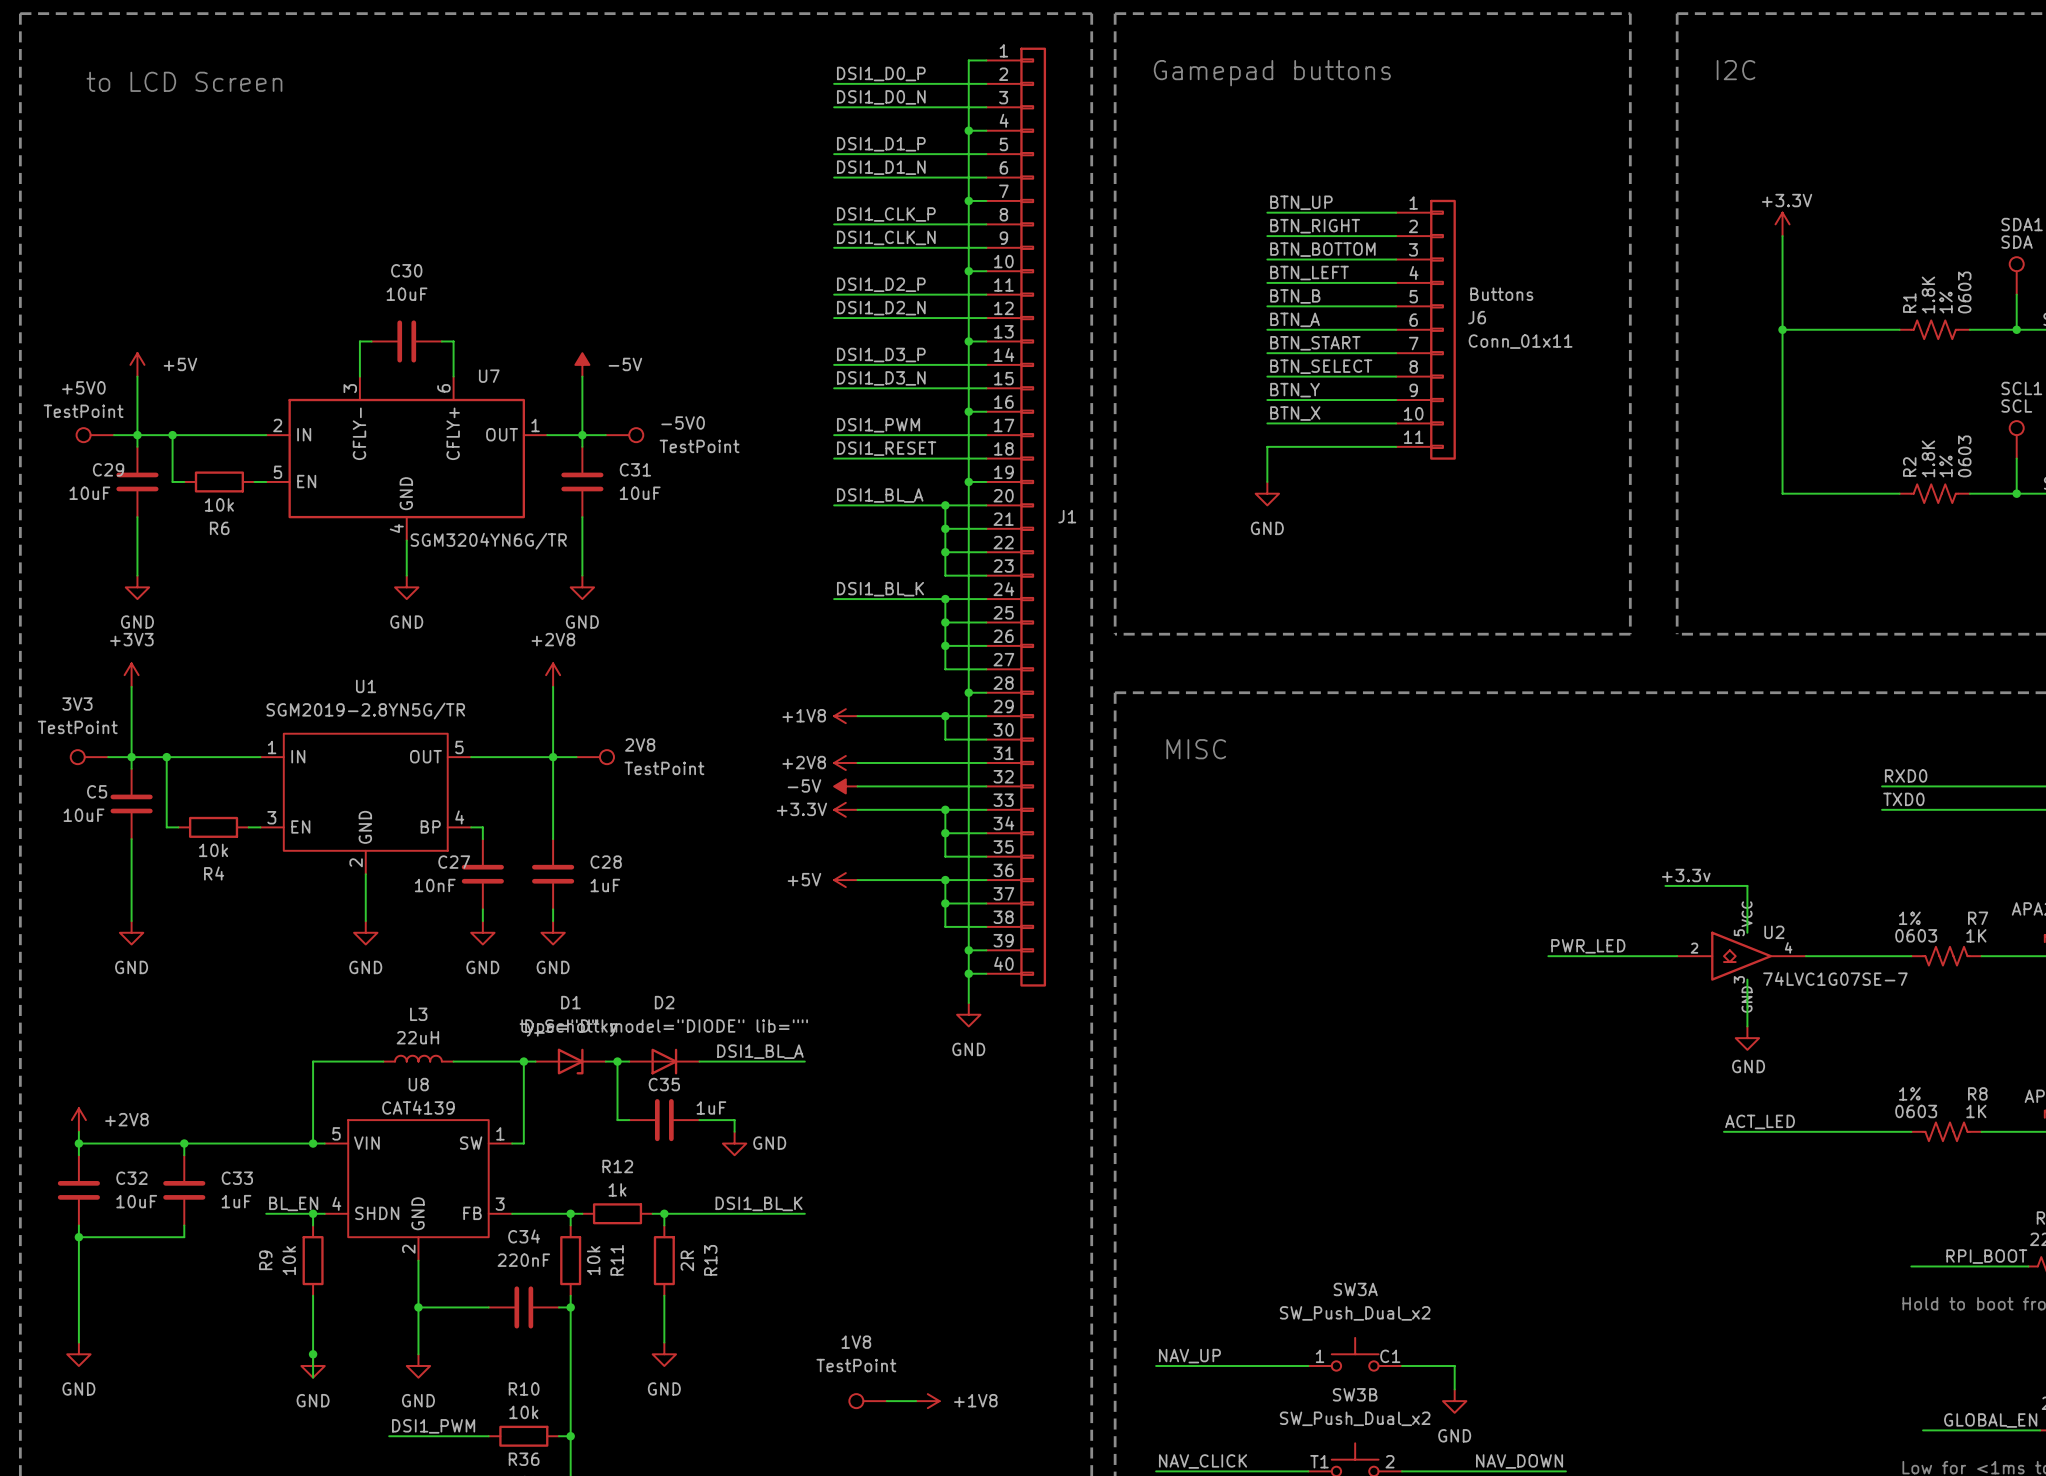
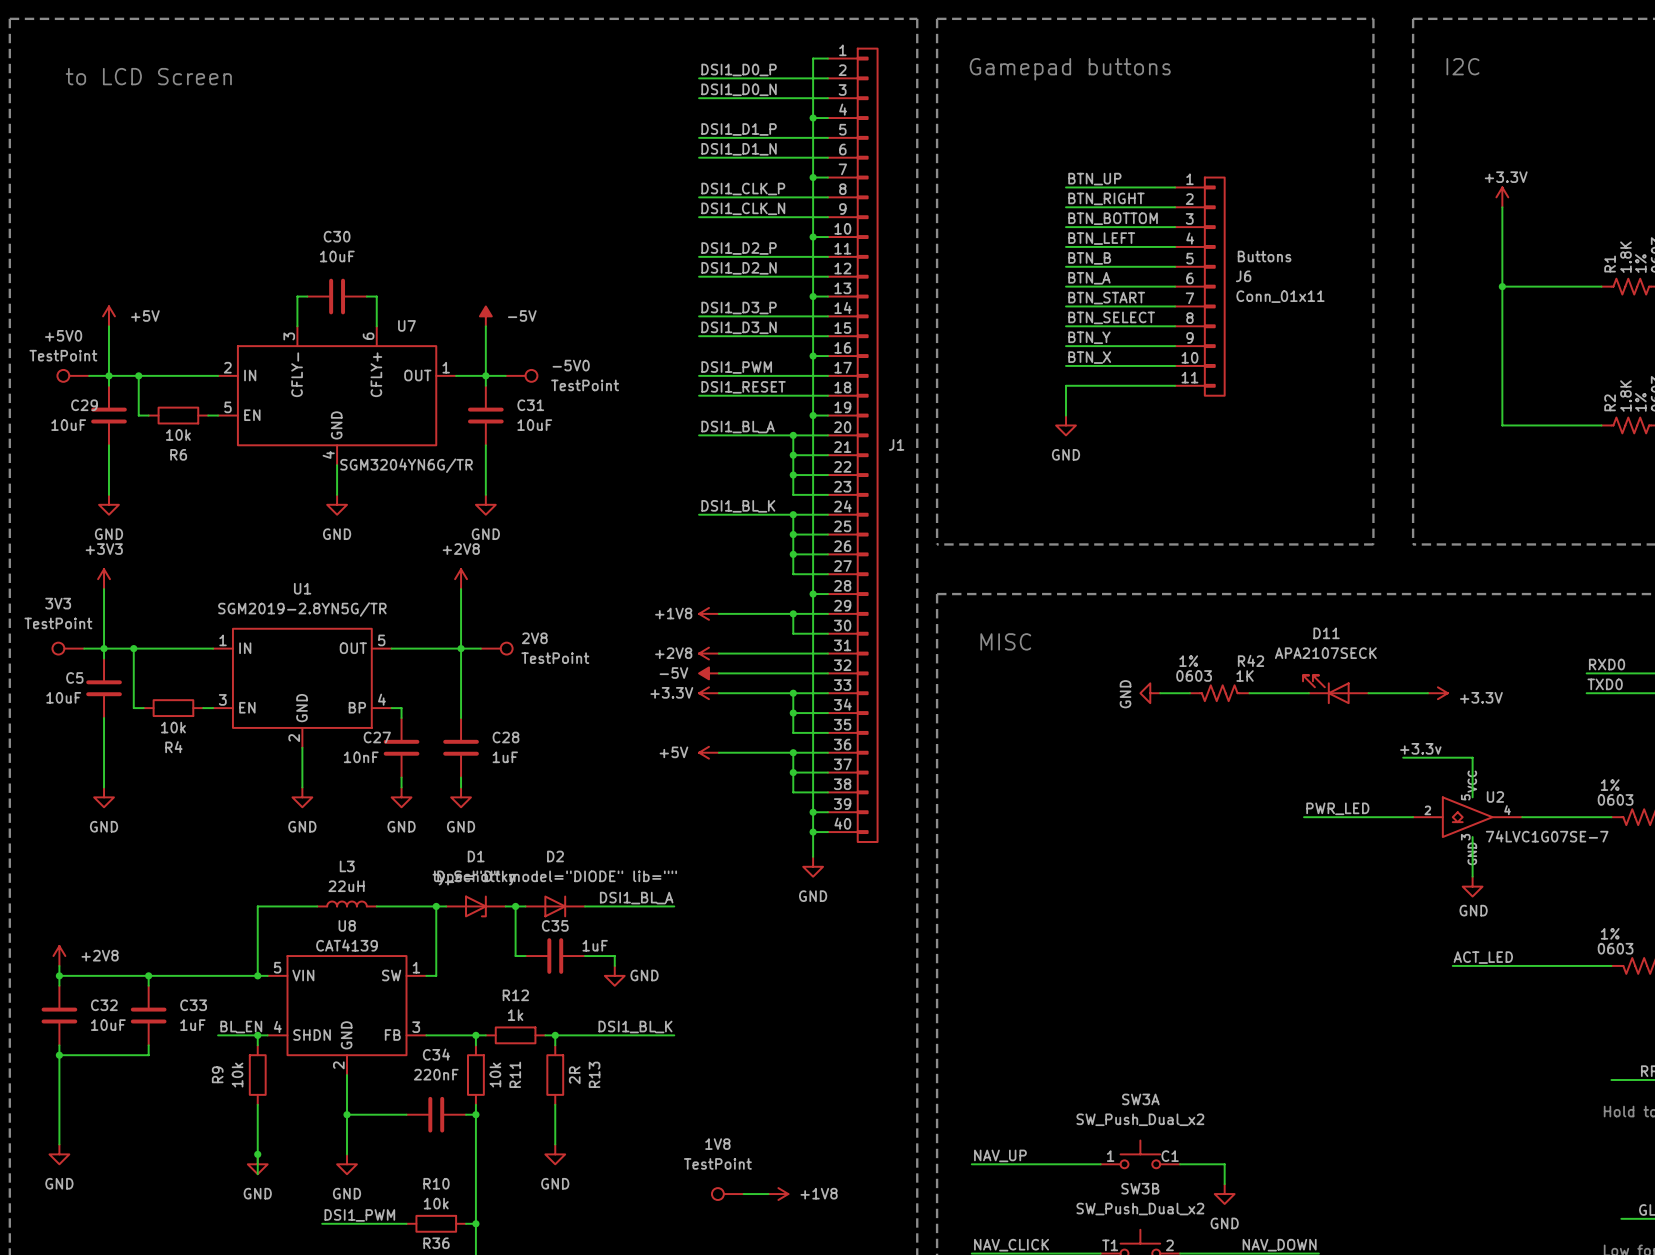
D11: none -> APA2107SECK (1335, 689)
power symbol: none -> GND (1150, 693)
wire: none -> (1160, 693) (1189, 693)
R42: none -> 1K (1219, 693)
wire: none -> (1249, 693) (1308, 693)
wire: none -> (1368, 693) (1427, 693)
power symbol: none -> +3.3V (1437, 693)

